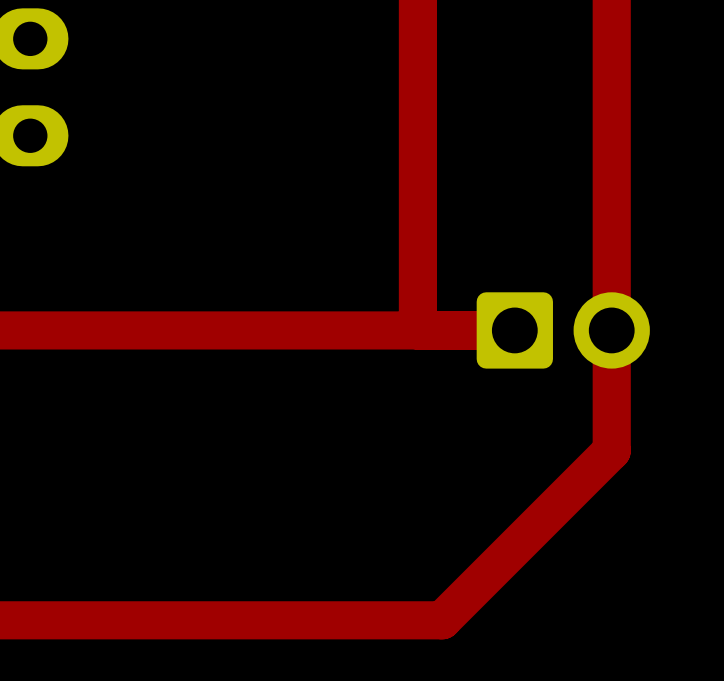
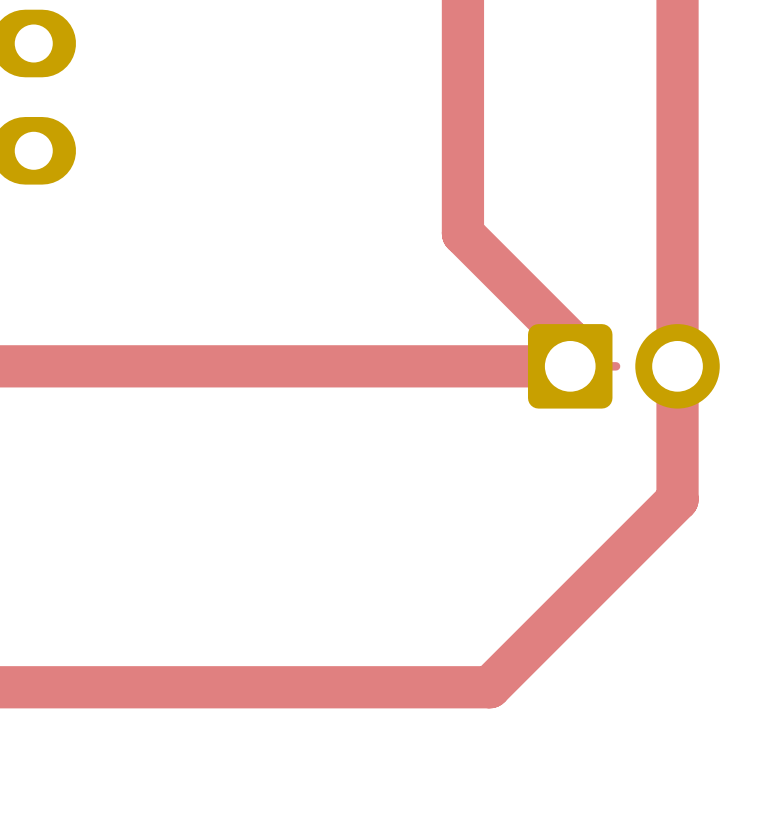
top track: (417, 210) (417, 330) -> (462, 233) (570, 340) (570, 366)
top track: none -> (616, 366) (606, 366)

